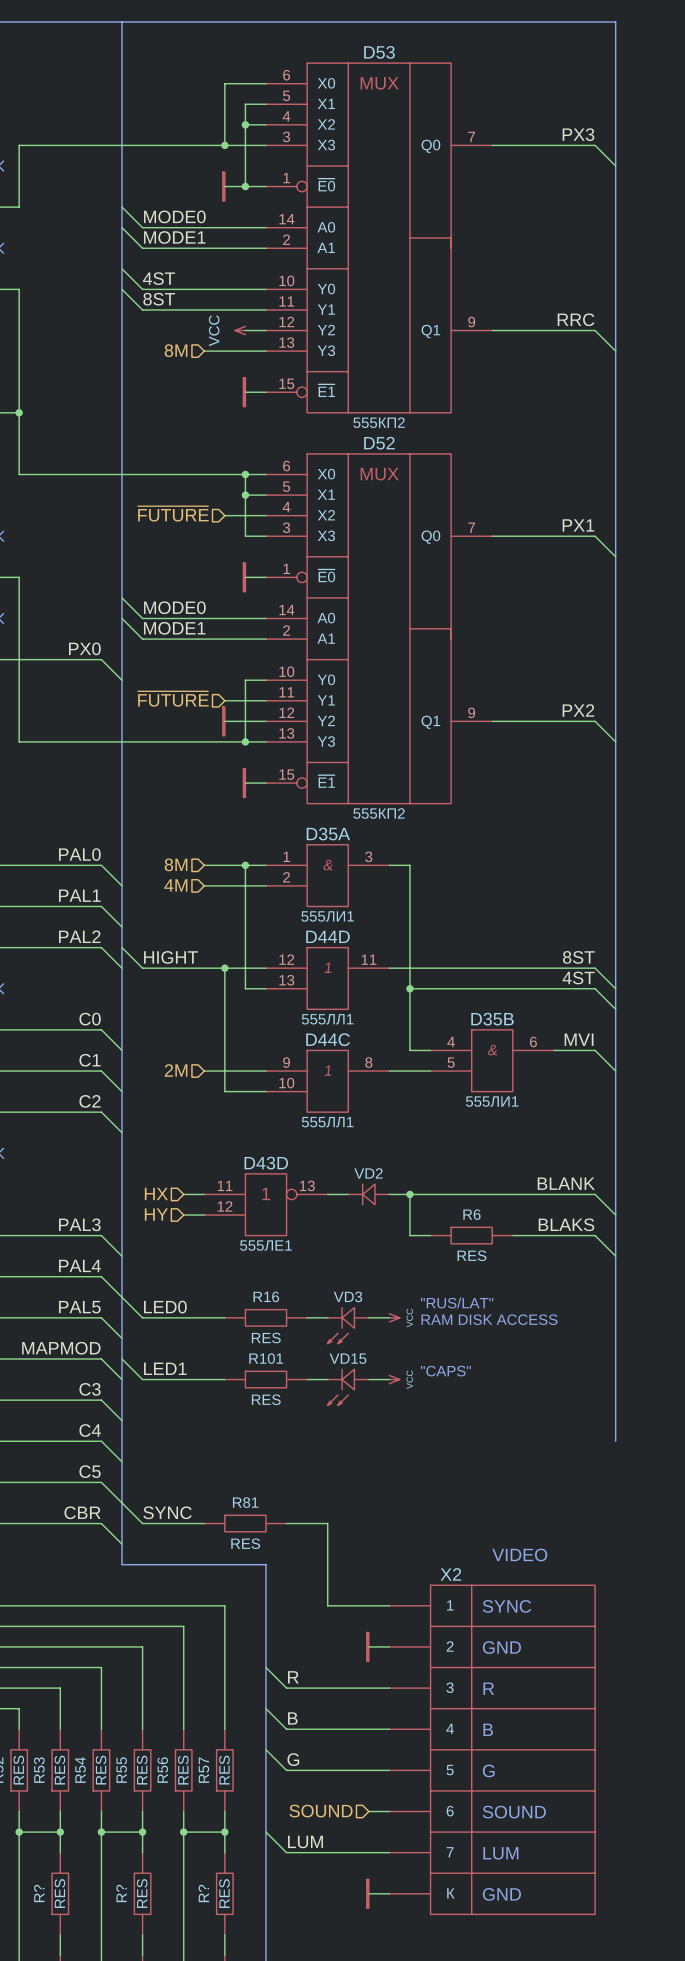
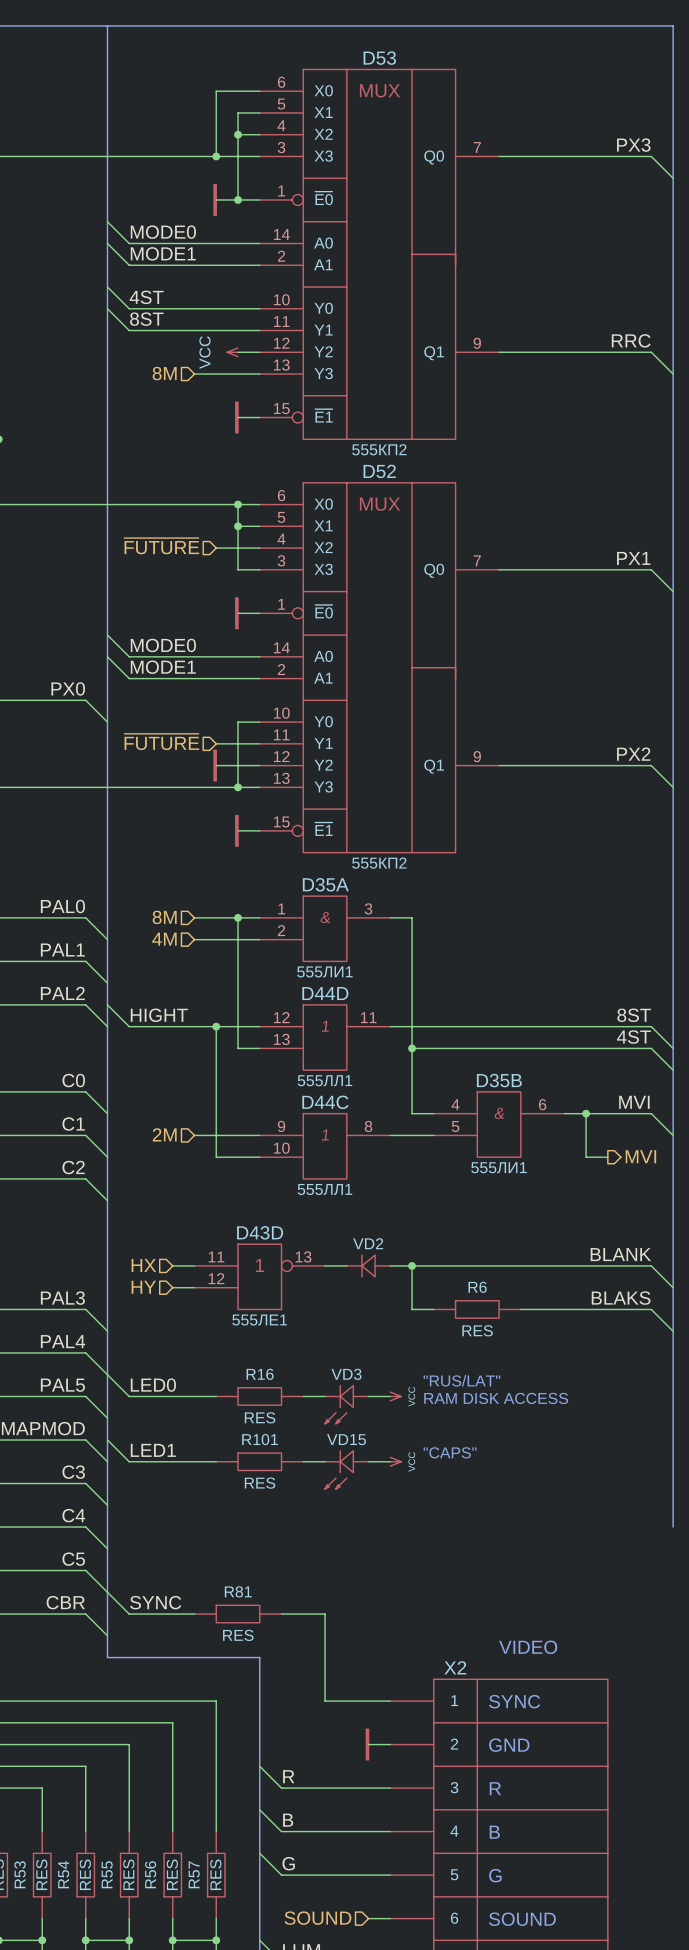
bus: (615, 21) (615, 1441) -> (629, 25) (673, 25) (673, 1527)
label position: PX3 (578, 134) -> PX3 (633, 145)
wire: (595, 145) (615, 165) -> (607, 156) (651, 156) (673, 178)
label position: RRC (576, 319) -> RRC (631, 340)
wire: (595, 330) (615, 351) -> (607, 352) (651, 352) (673, 374)
label position: PX1 (578, 525) -> PX1 (633, 558)
wire: (595, 536) (615, 556) -> (607, 569) (651, 569) (673, 591)
label position: PX2 (578, 710) -> PX2 (633, 754)
wire: (595, 721) (615, 741) -> (607, 765) (651, 765) (673, 787)
label position: 8ST (578, 957) -> 8ST (634, 1015)
wire: (595, 968) (615, 988) -> (607, 1026) (651, 1026) (673, 1048)
label position: 4ST (578, 977) -> 4ST (633, 1037)
wire: (595, 988) (615, 1009) -> (607, 1048) (651, 1048) (673, 1070)
label position: MVI (579, 1039) -> MVI (634, 1102)
wire: none -> (586, 1113) (586, 1157) (607, 1157)
junction: none -> (586, 1113)
wire: (595, 1050) (615, 1071) -> (607, 1113) (651, 1113) (673, 1135)
hierarchical label: none -> MVI (640, 1156)
label position: BLANK (566, 1183) -> BLANK (620, 1254)
wire: (595, 1194) (615, 1215) -> (607, 1265) (651, 1265) (673, 1287)
label position: BLAKS (566, 1224) -> BLAKS (621, 1298)
wire: (595, 1235) (615, 1256) -> (607, 1309) (651, 1309) (673, 1331)

